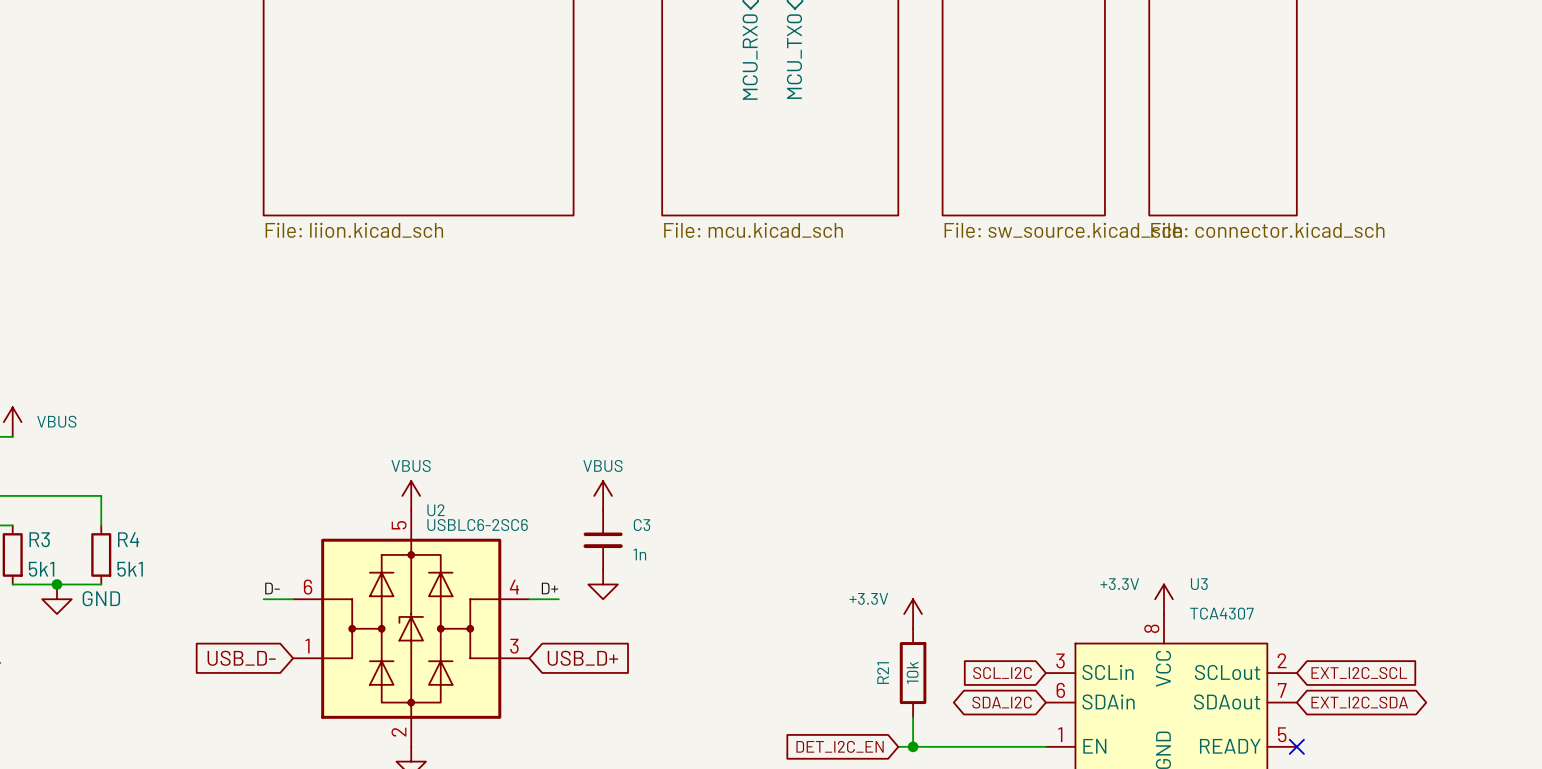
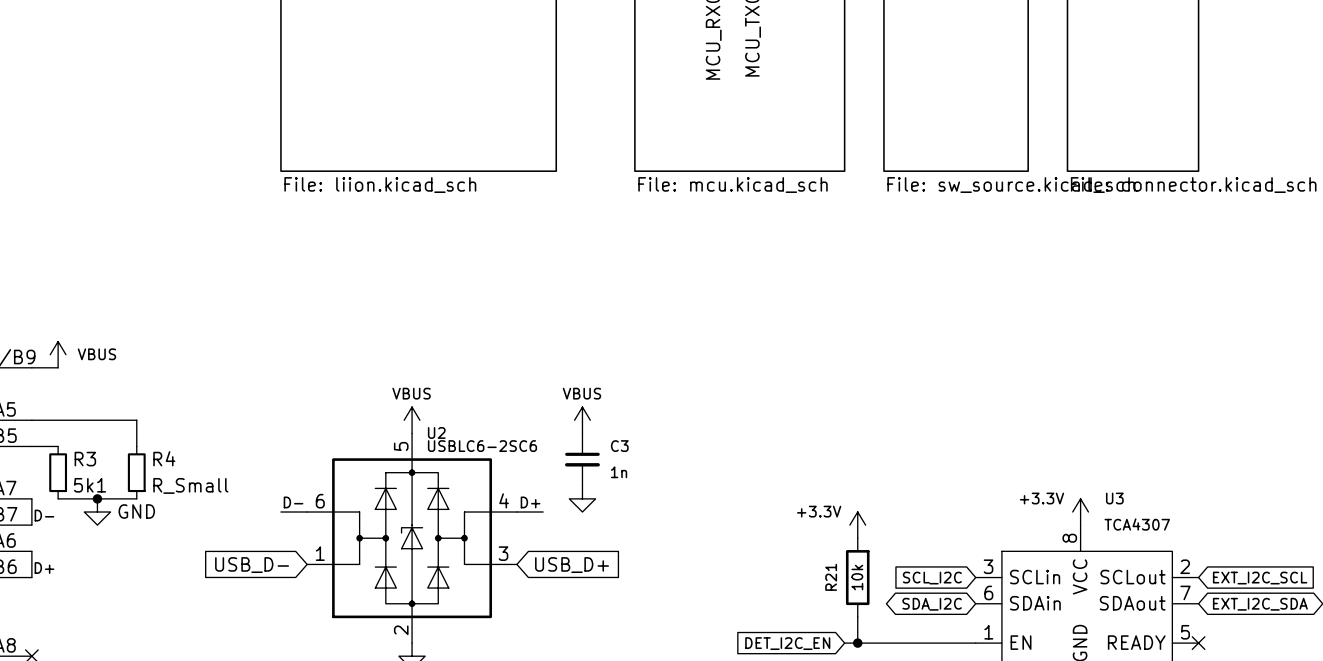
R4 value: 5k1 (130, 569) -> R_Small (190, 485)

